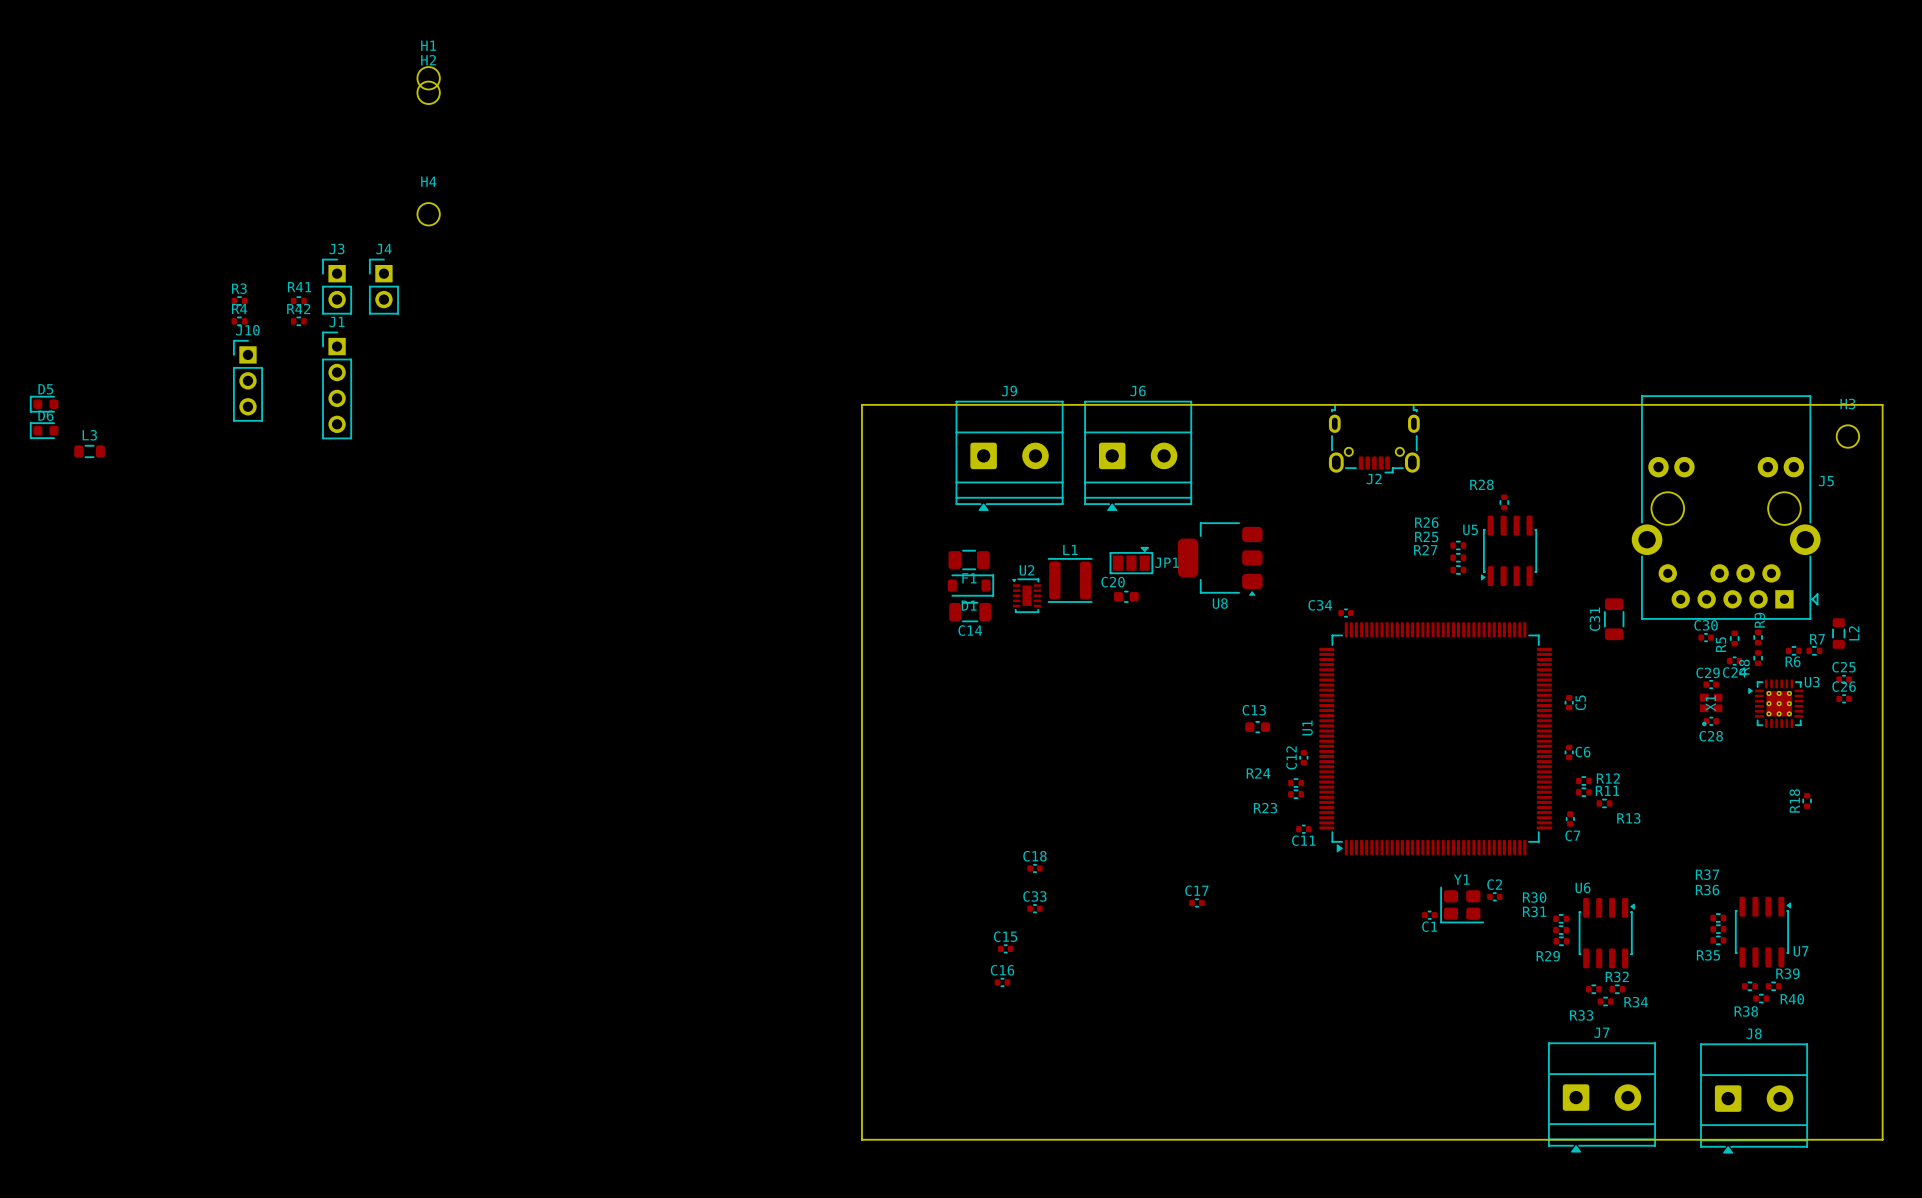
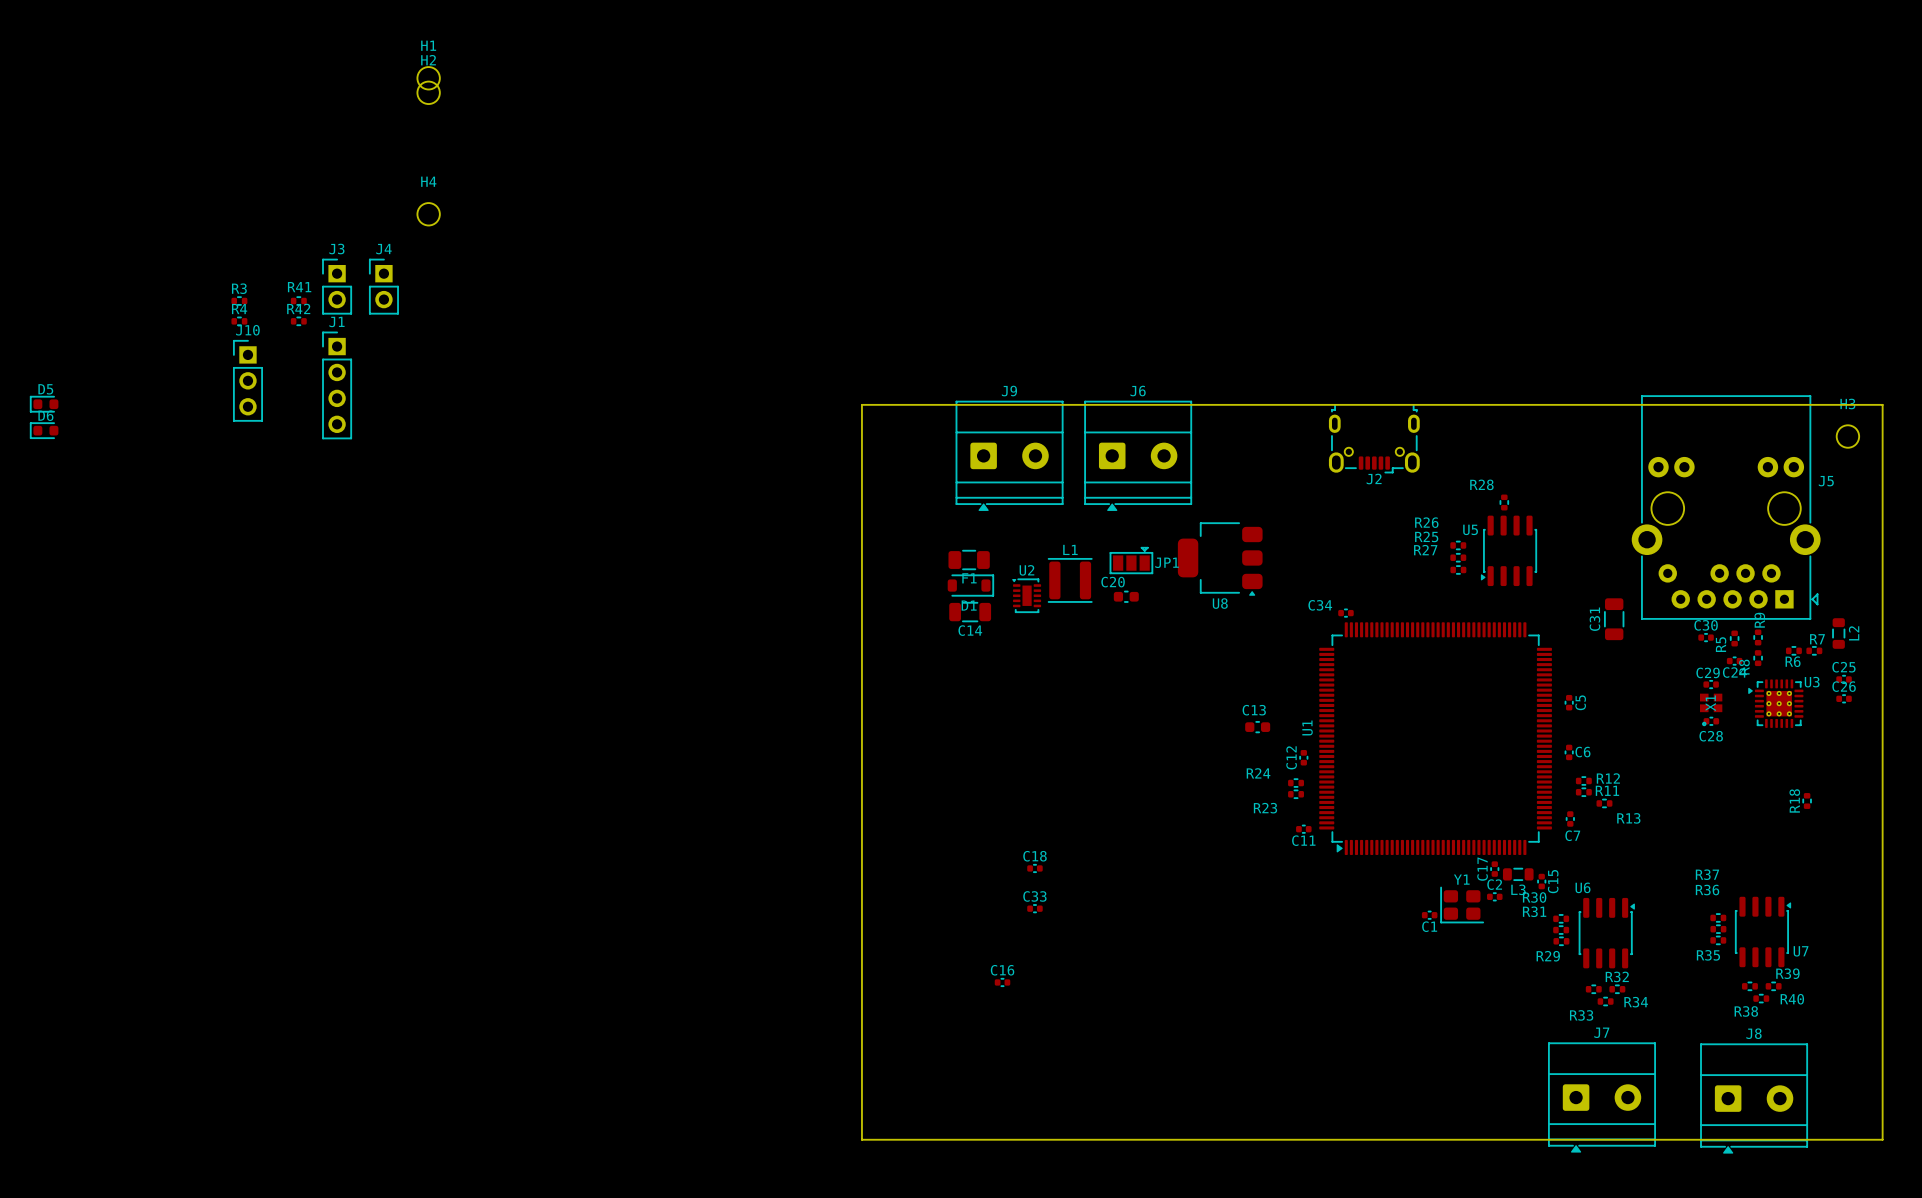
L3 name position: L3 (89, 435) -> L3 (1518, 889)
L3 position: (89, 451) -> (1518, 874)
C17 rotation: 0° (1196, 902) -> 90° clockwise (1494, 869)
C17 position: (1196, 902) -> (1494, 869)
C15 rotation: 0° (1005, 948) -> 90° clockwise (1541, 881)
C15 position: (1005, 948) -> (1541, 881)

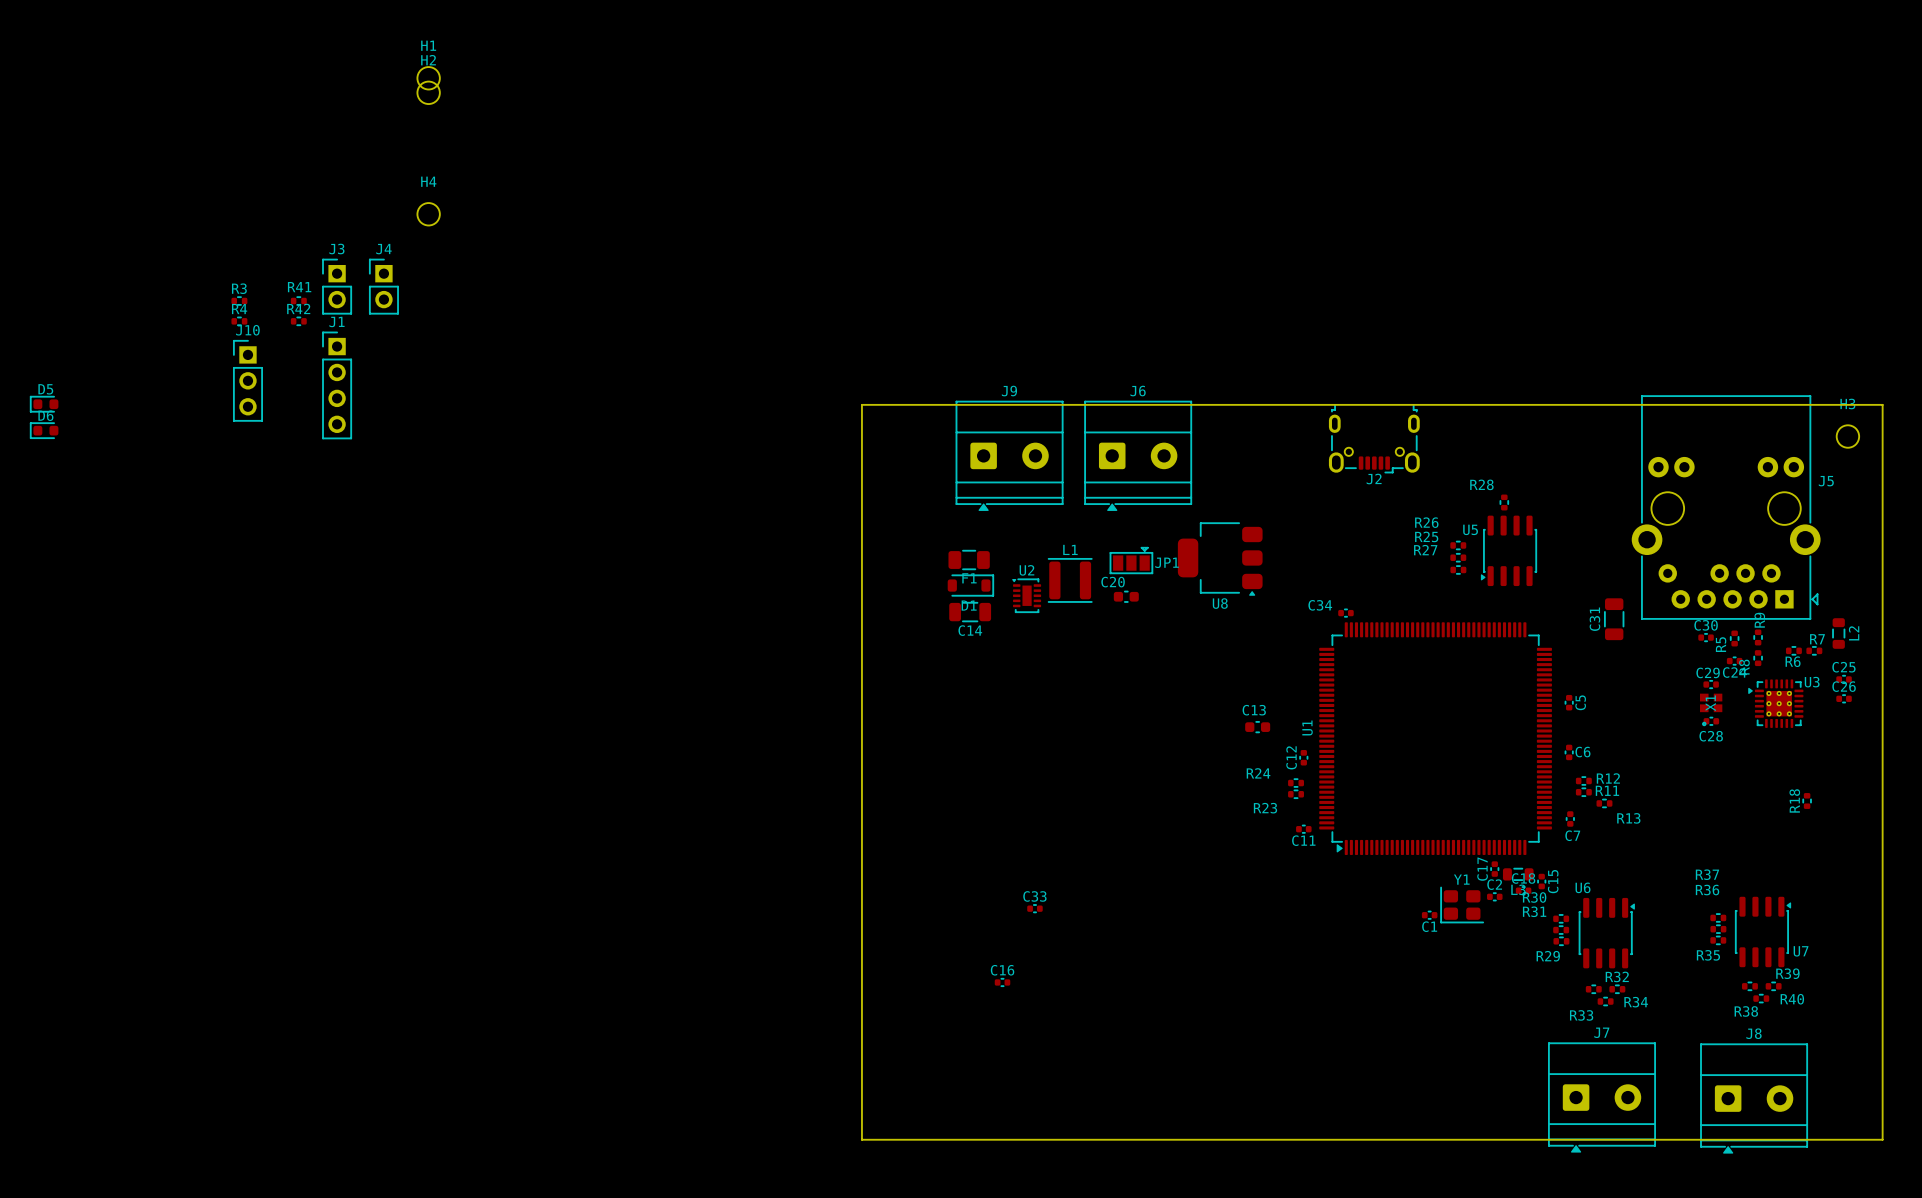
C18 position: (1034, 868) -> (1523, 890)

